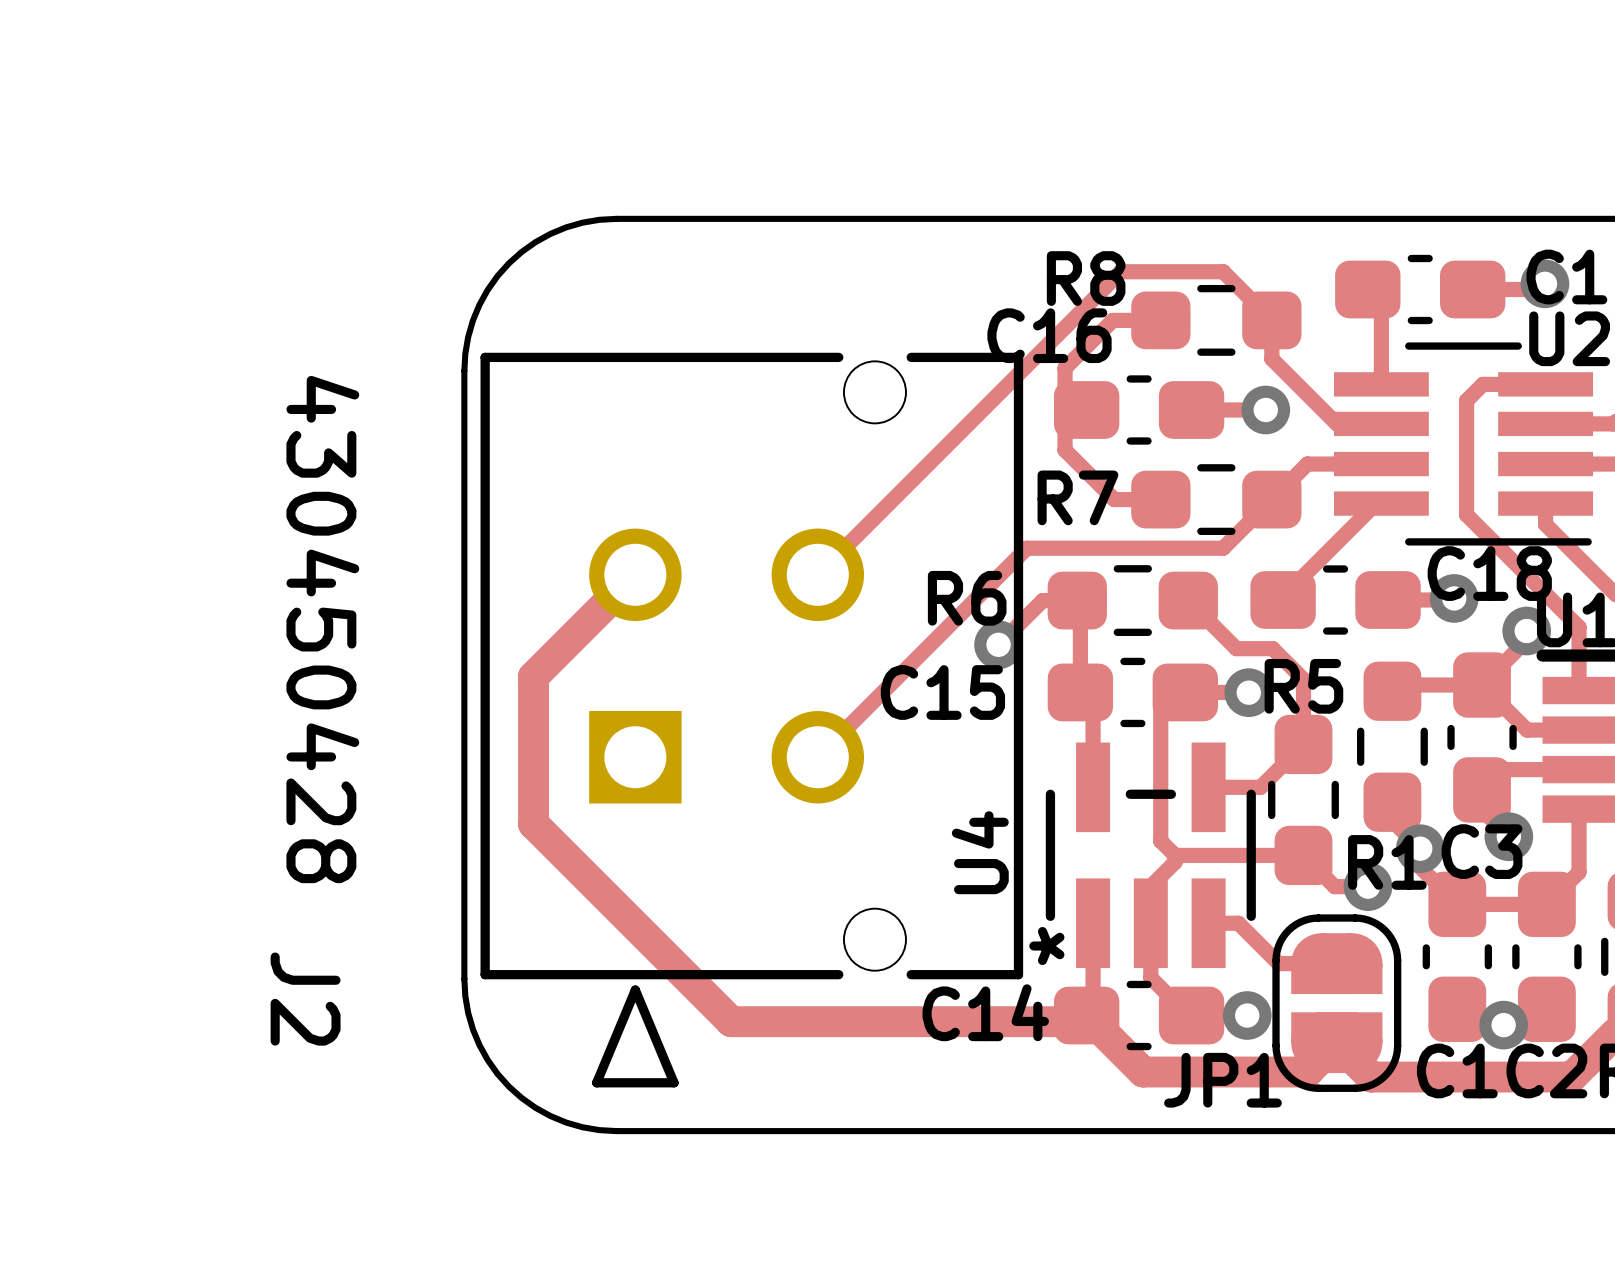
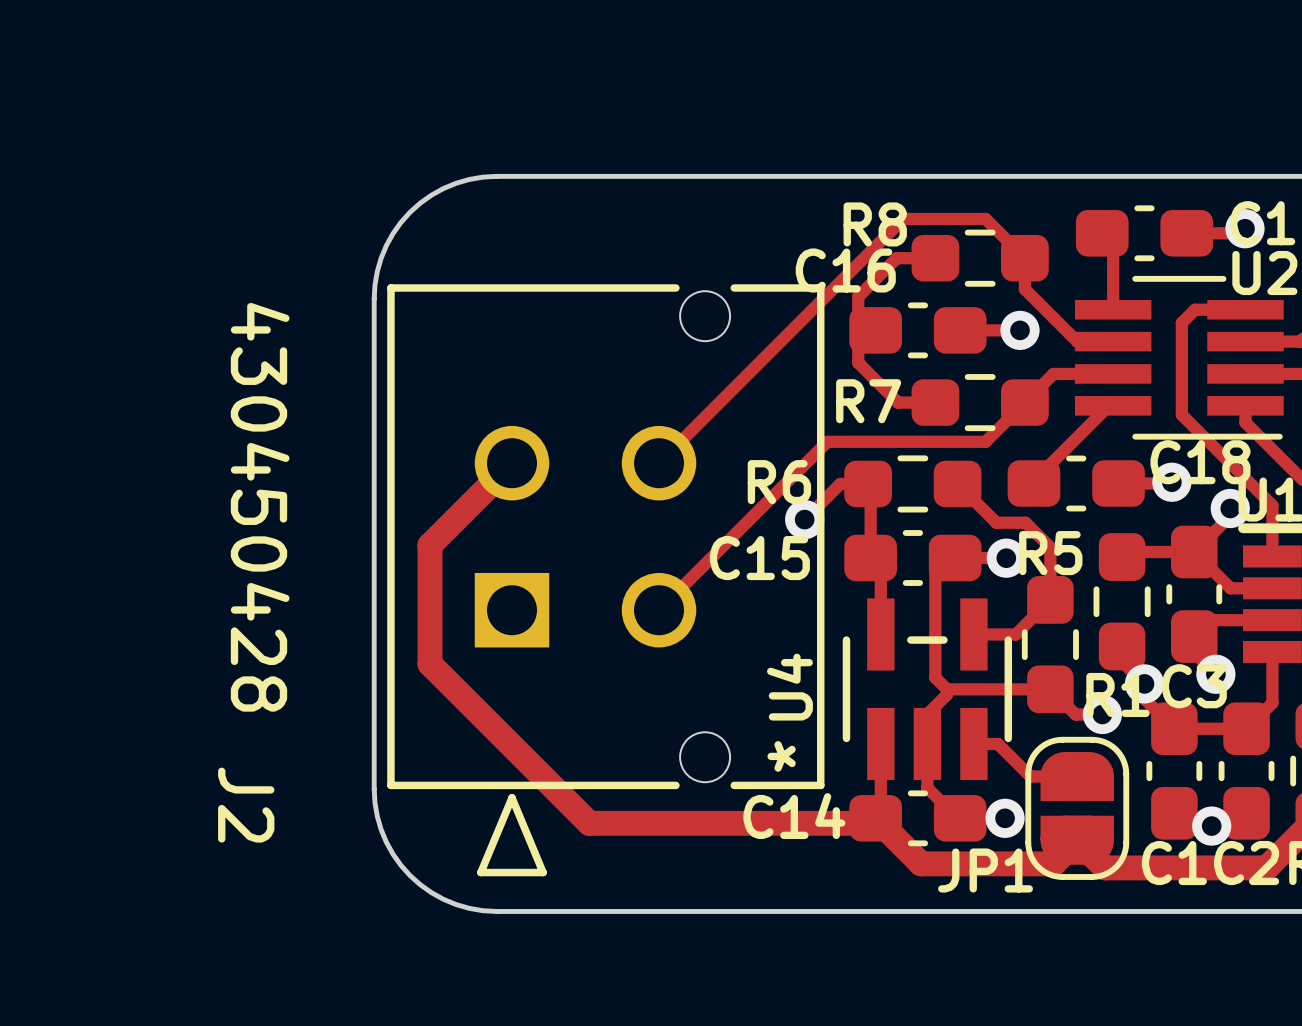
U4 text position: * (1046, 946) -> * (781, 756)

